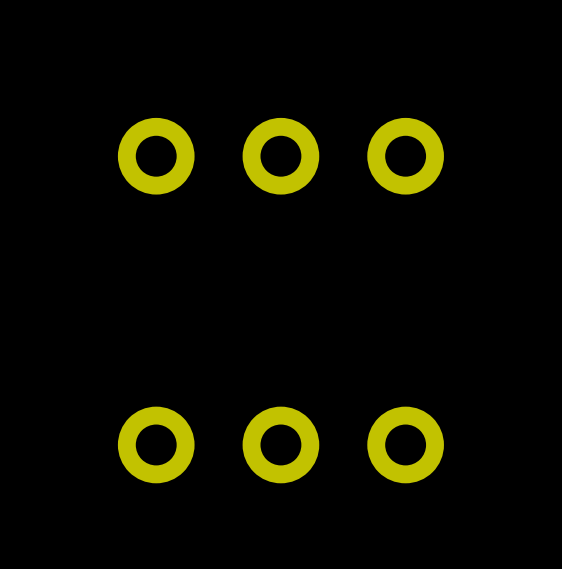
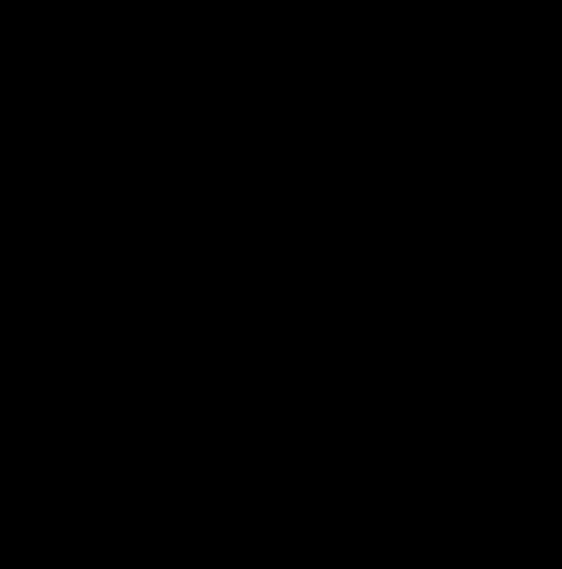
part: (280, 156) -> none
part: (280, 444) -> none

